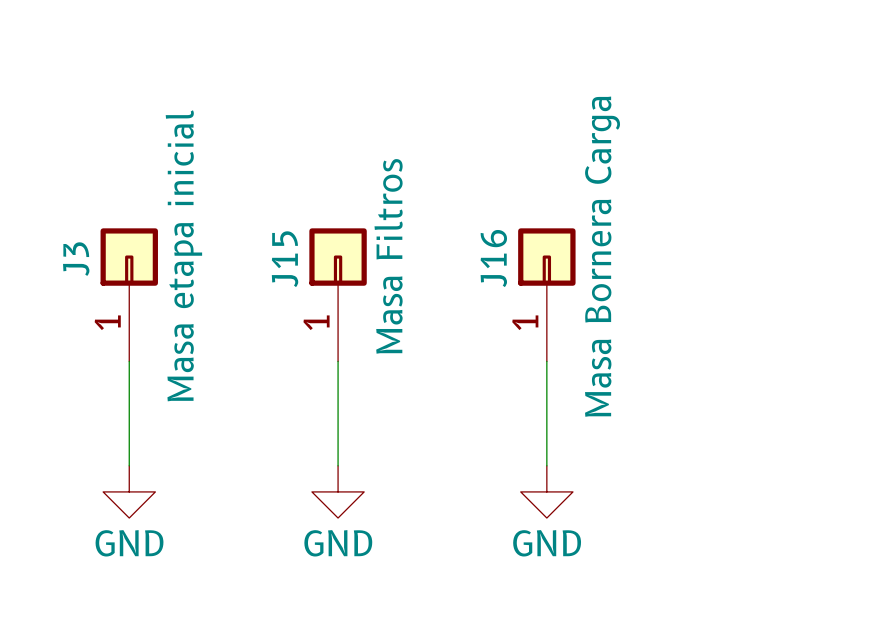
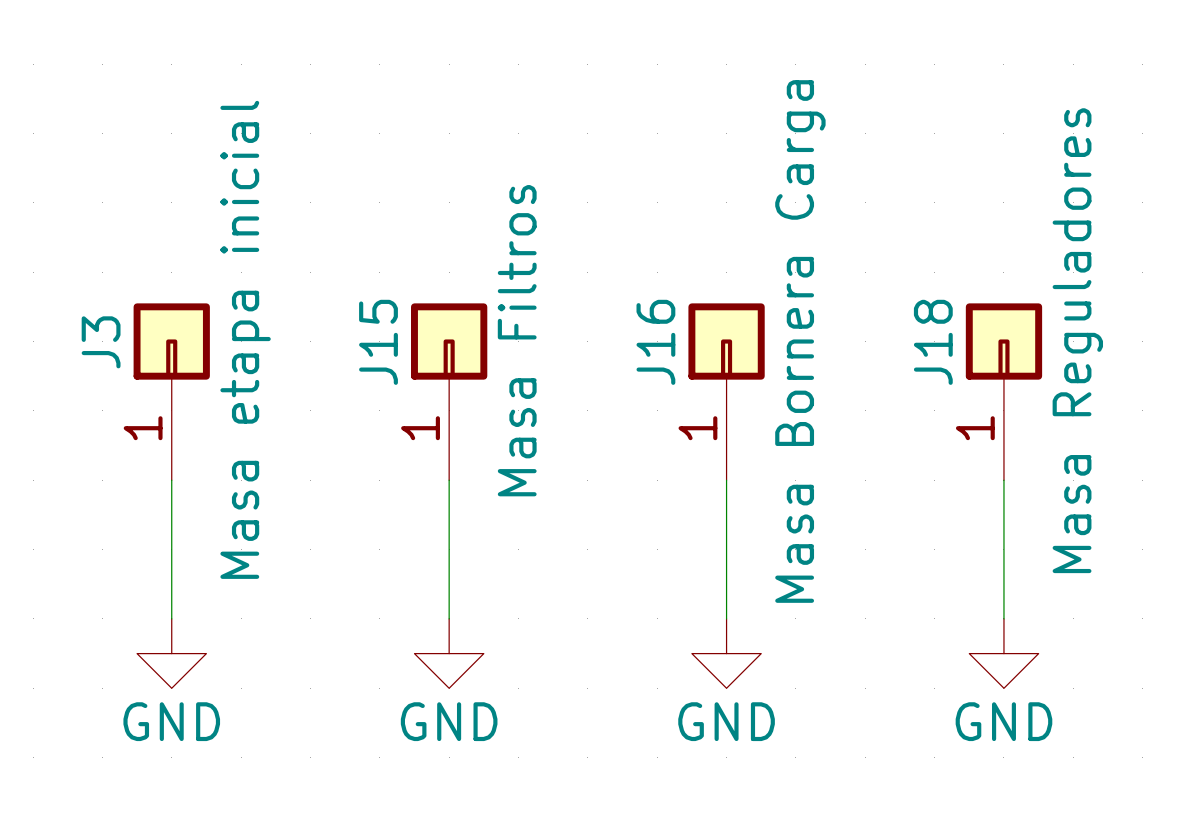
J18: none -> Masa Reguladores (1003, 391)
wire: none -> (1003, 480) (1003, 618)
power symbol: none -> GND (1003, 653)

